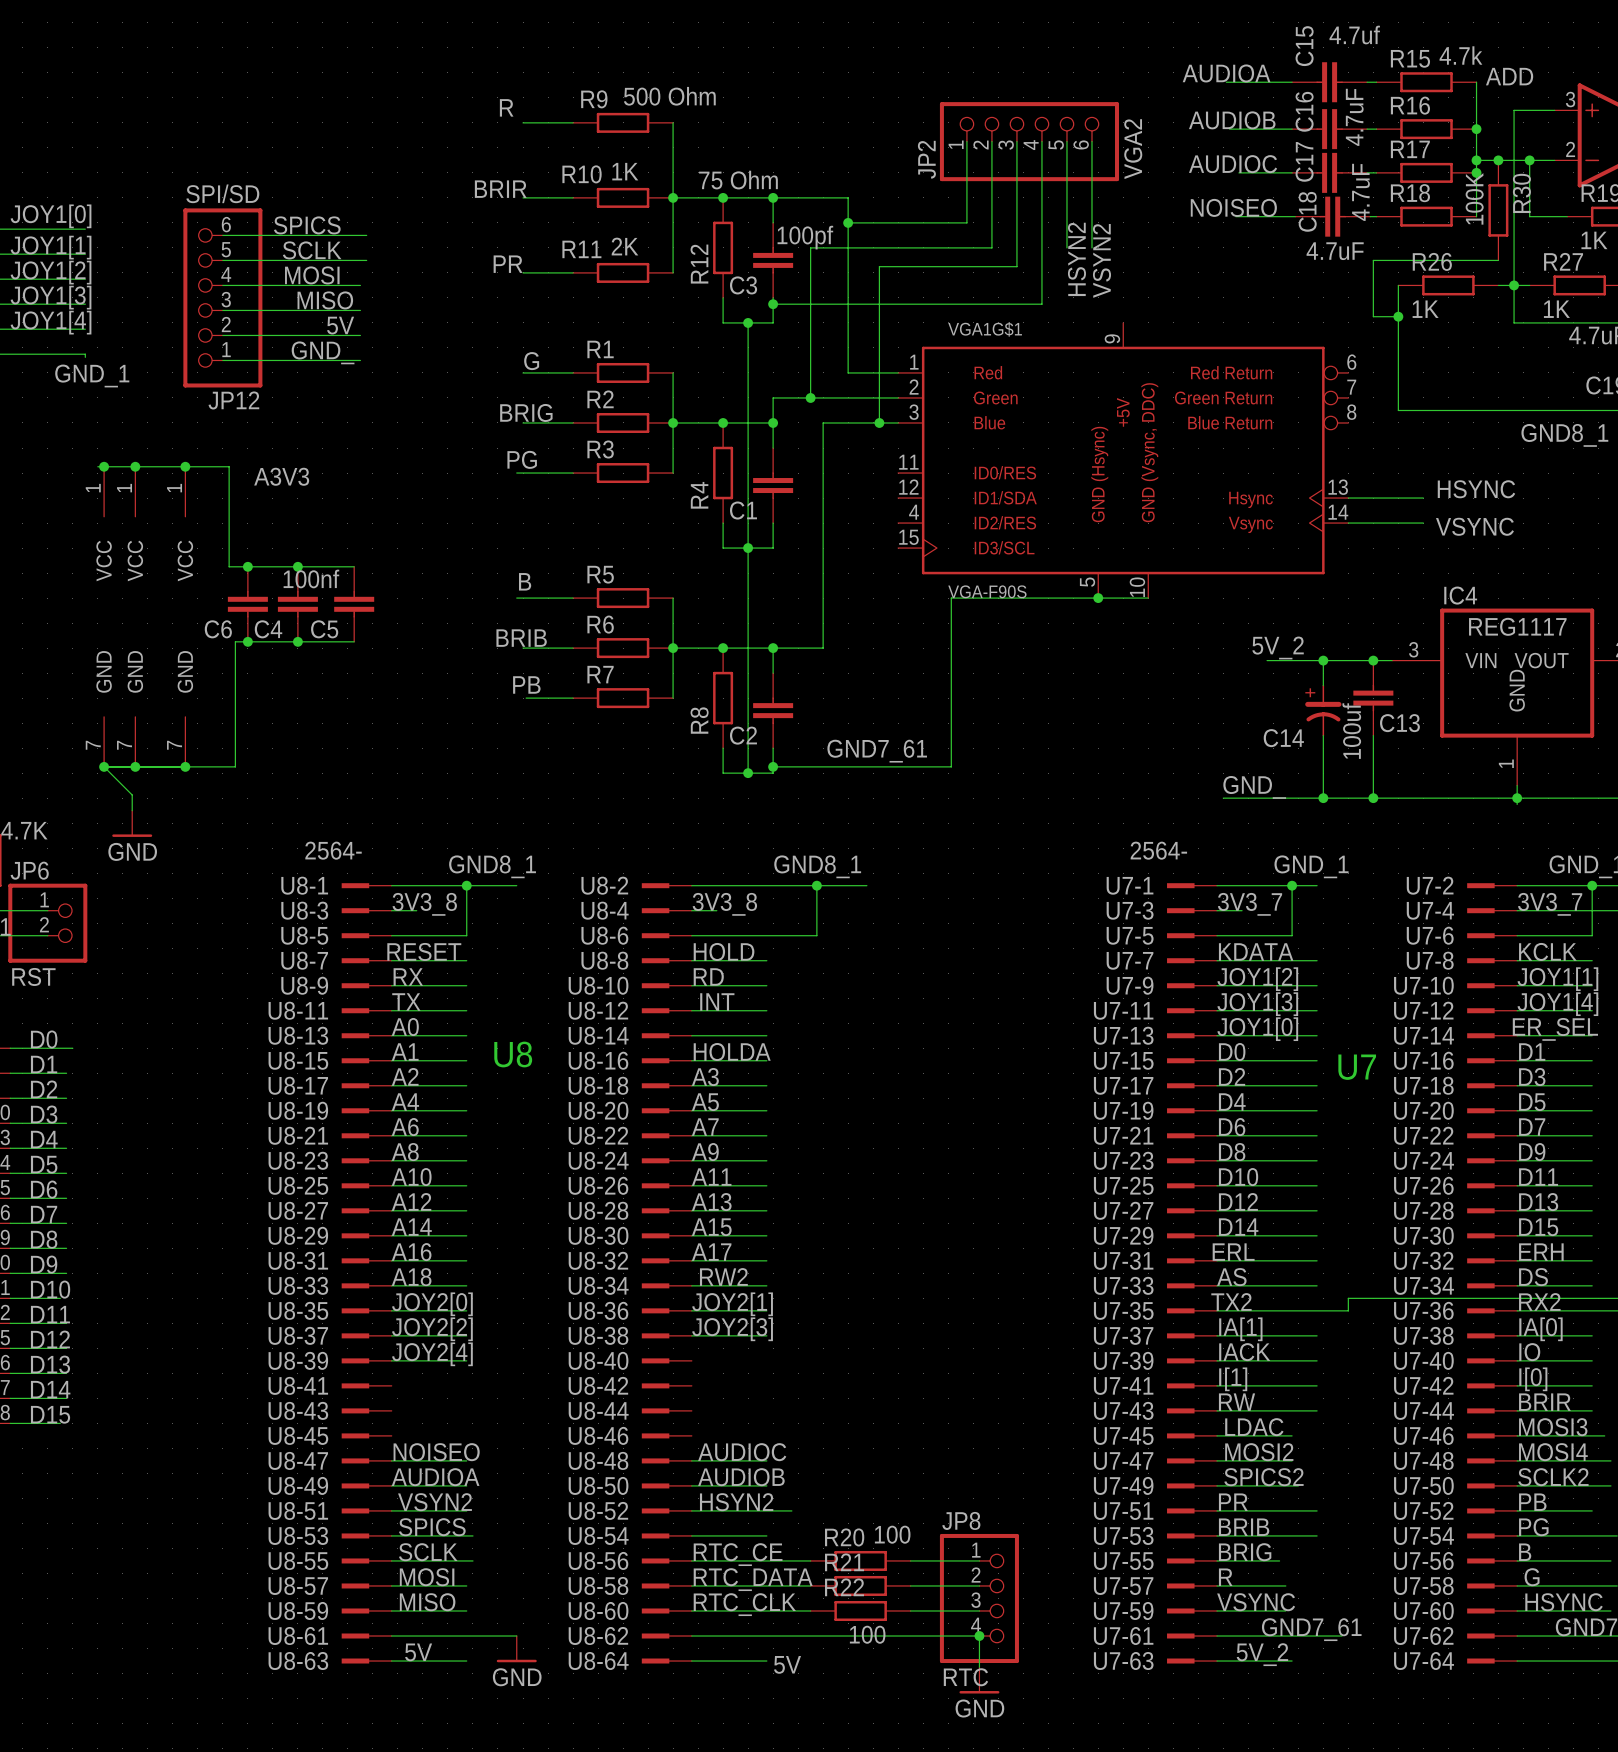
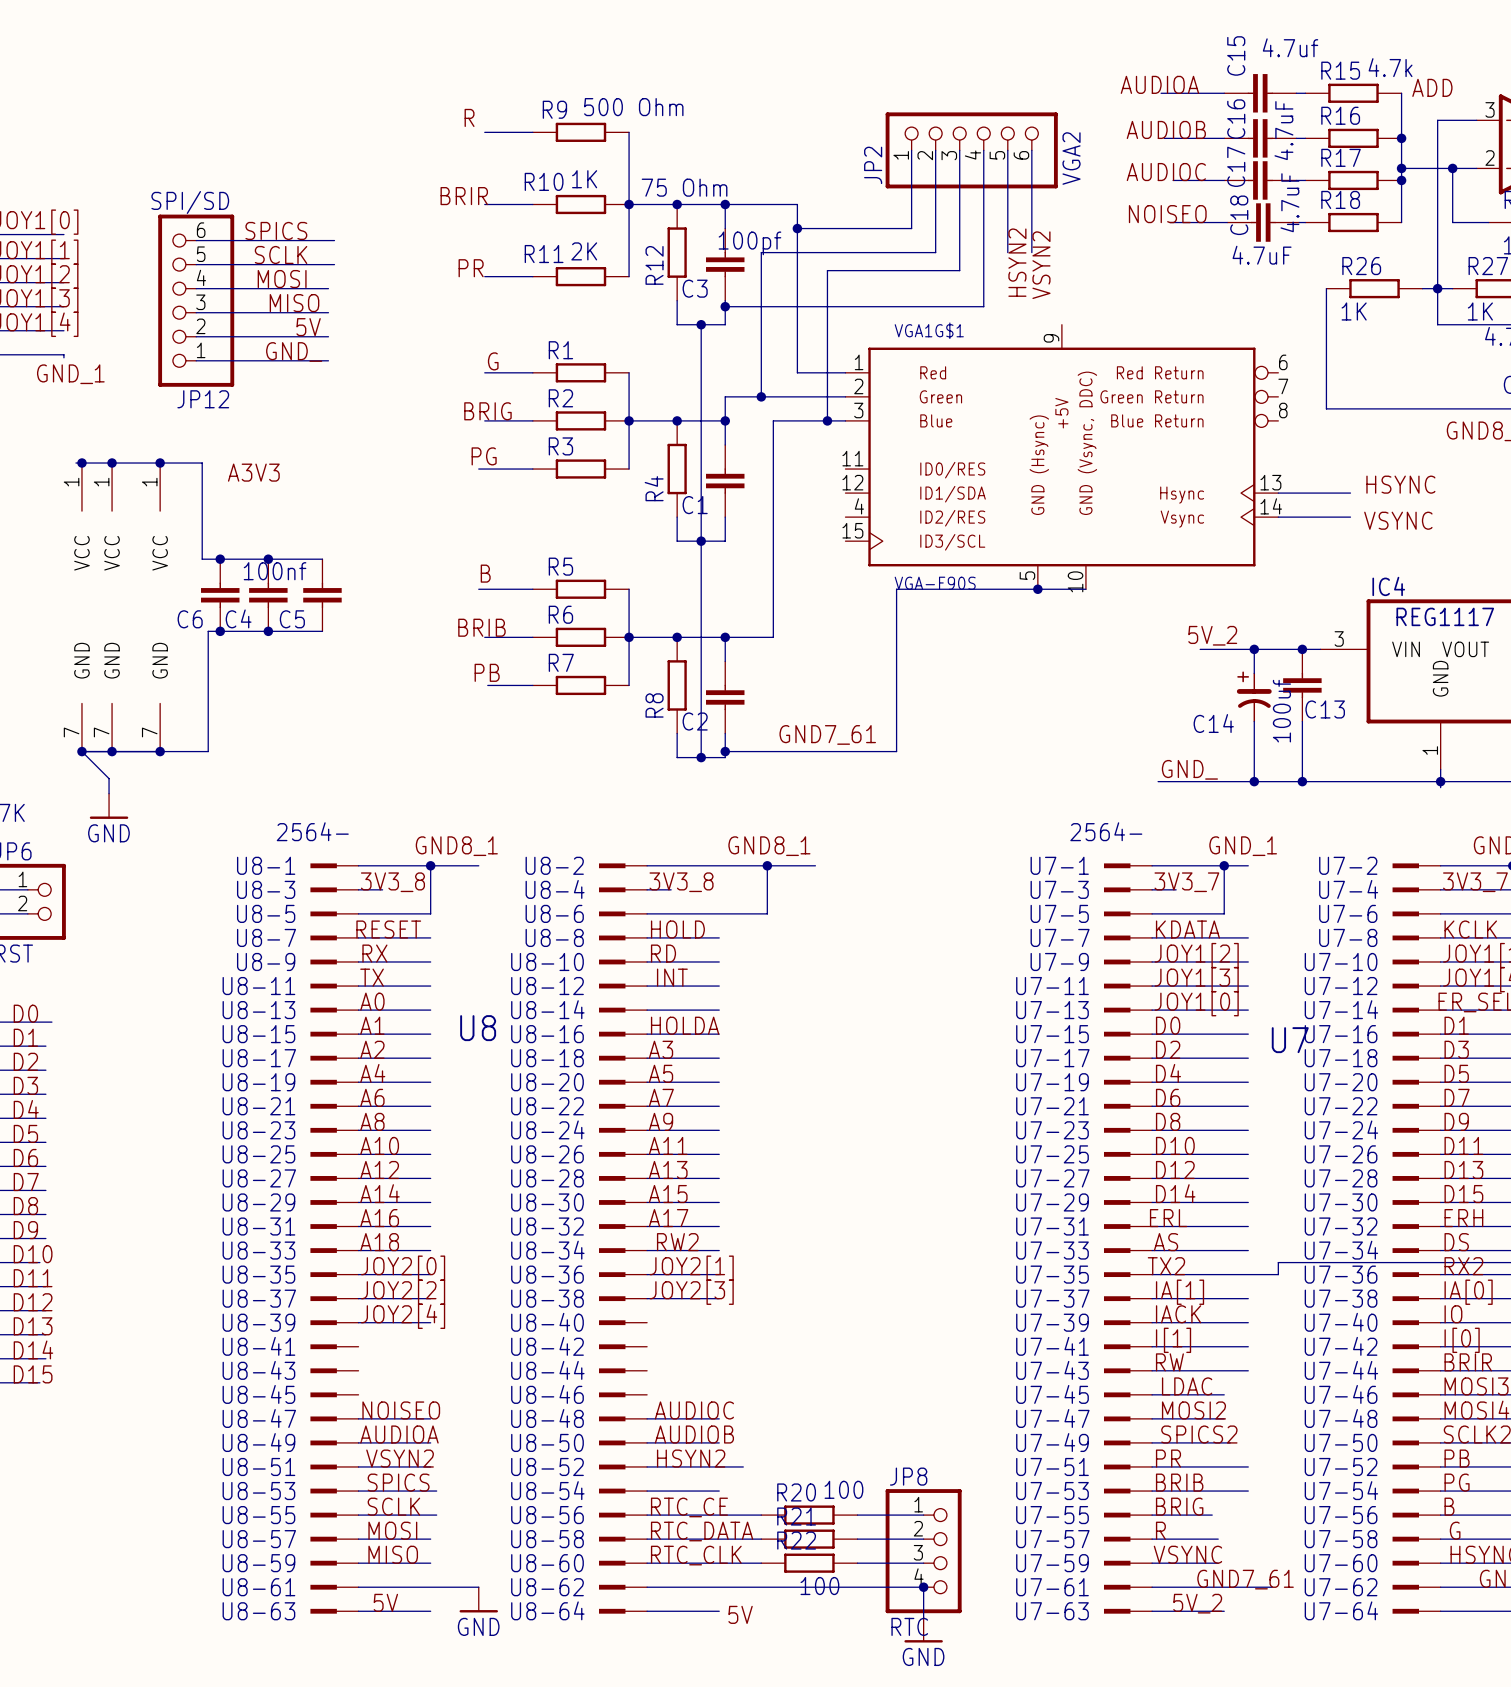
junction: (1498, 160) -> none
R30: 100K (1498, 210) -> none
wire: (1498, 260) (1373, 260) (1373, 316) (1398, 316) -> none
junction: (1398, 316) -> none

